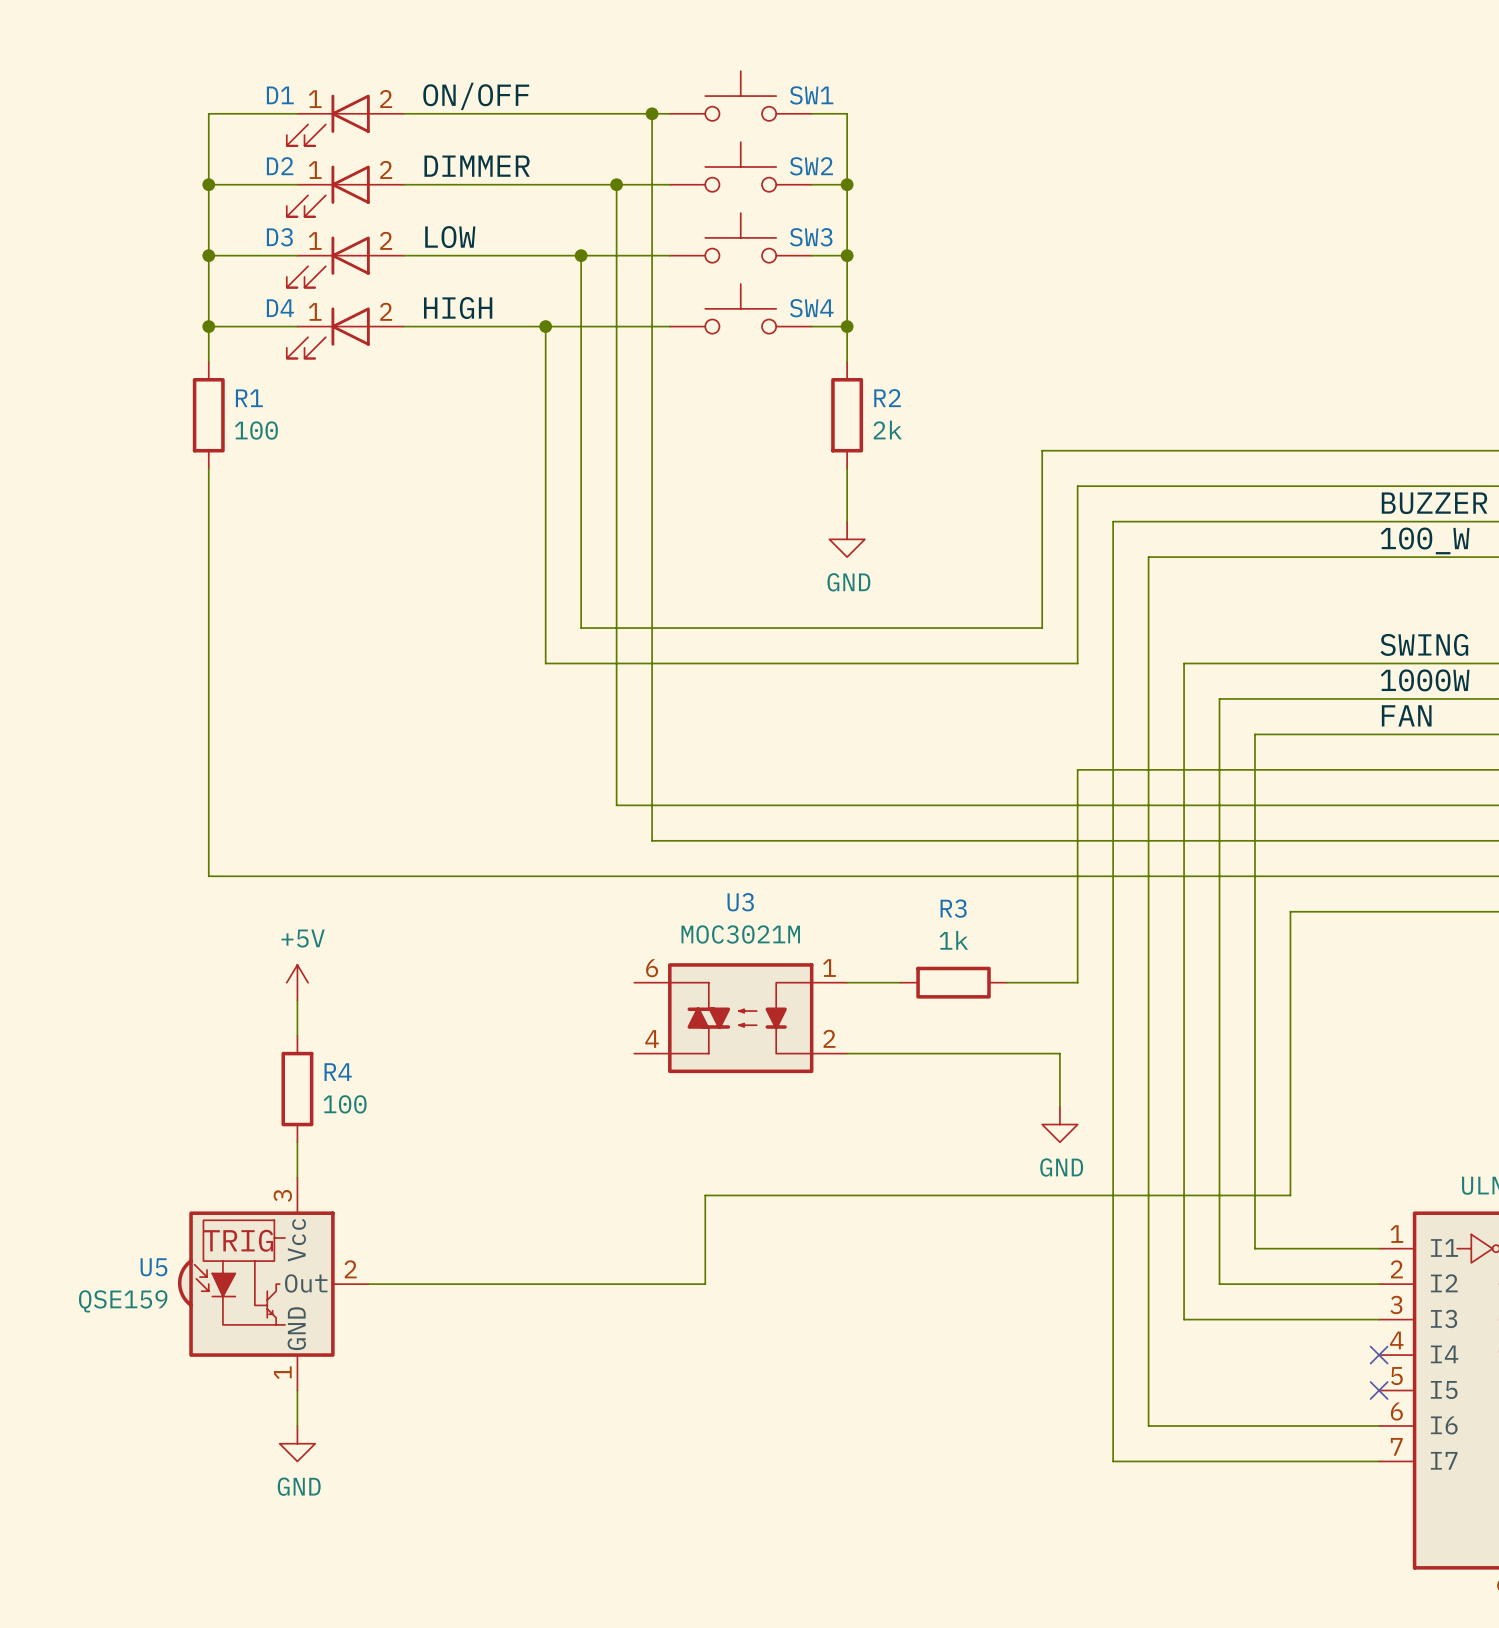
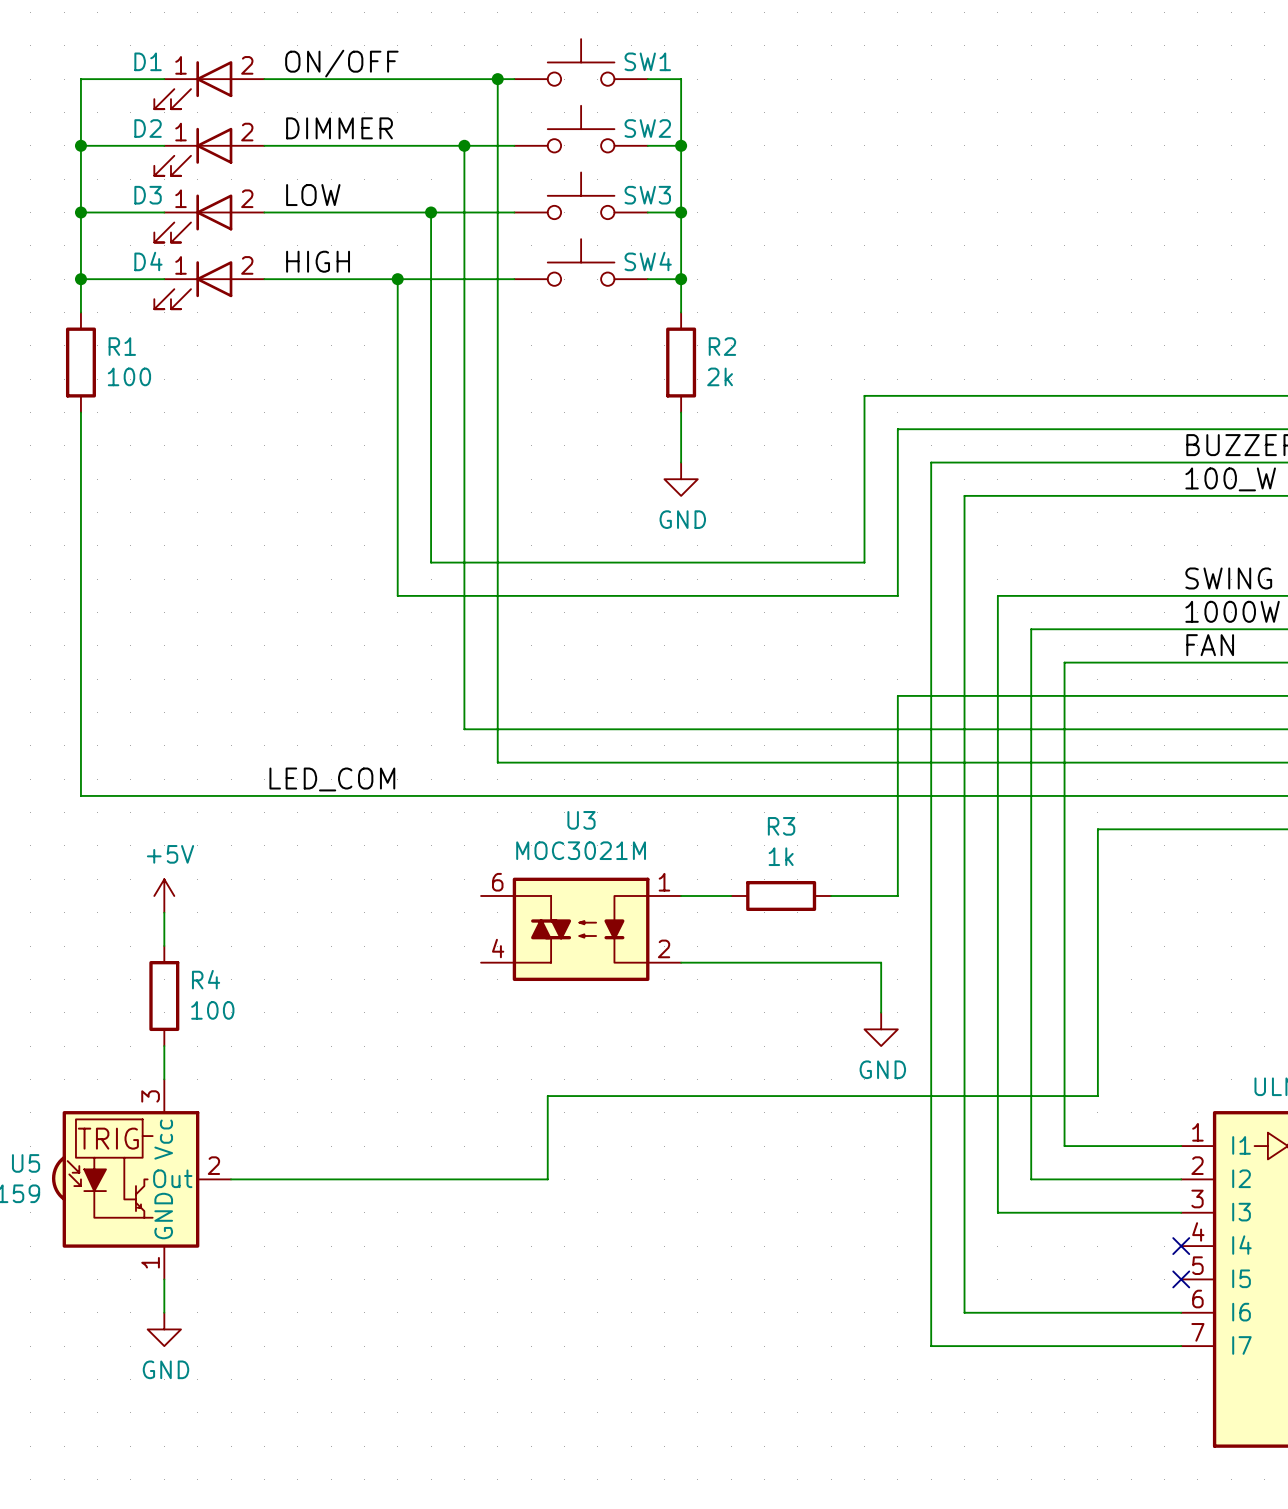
label: none -> LED_COM (332, 779)

